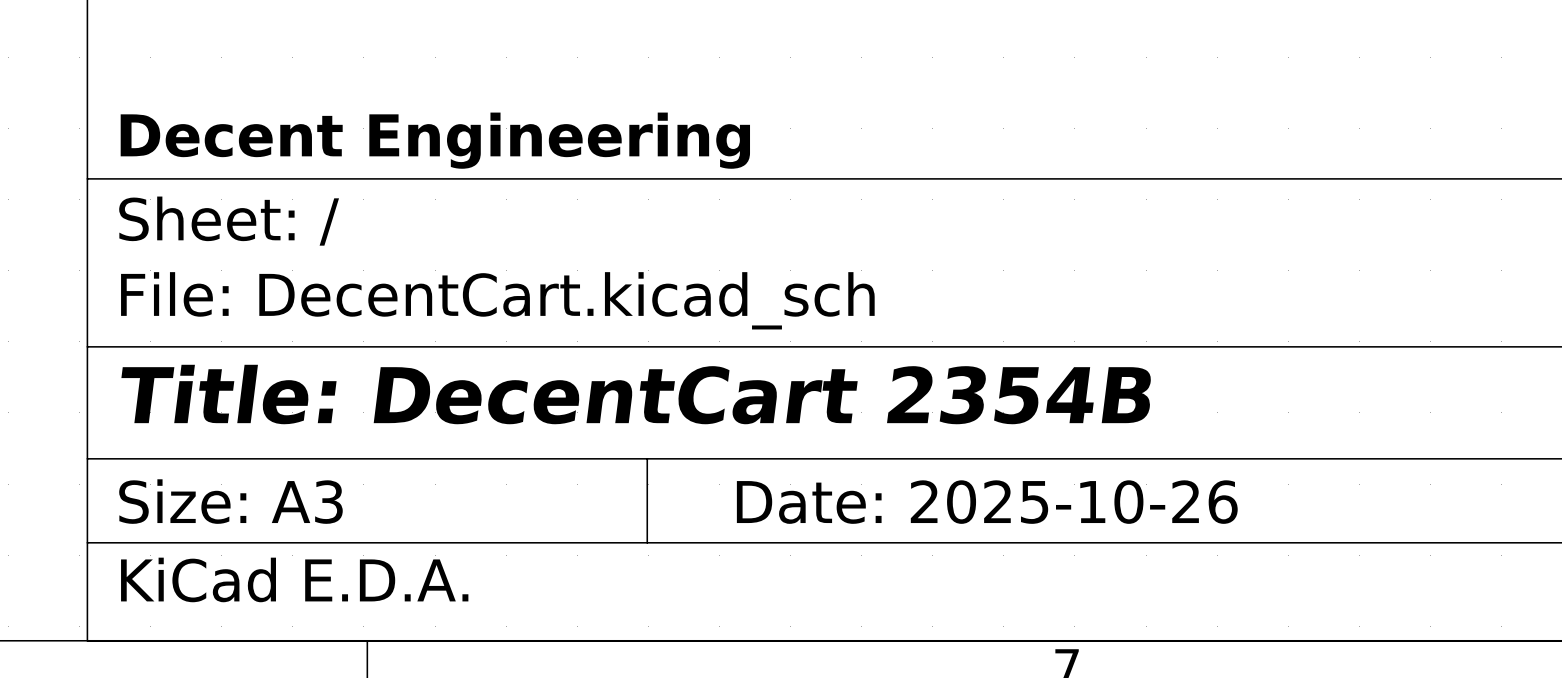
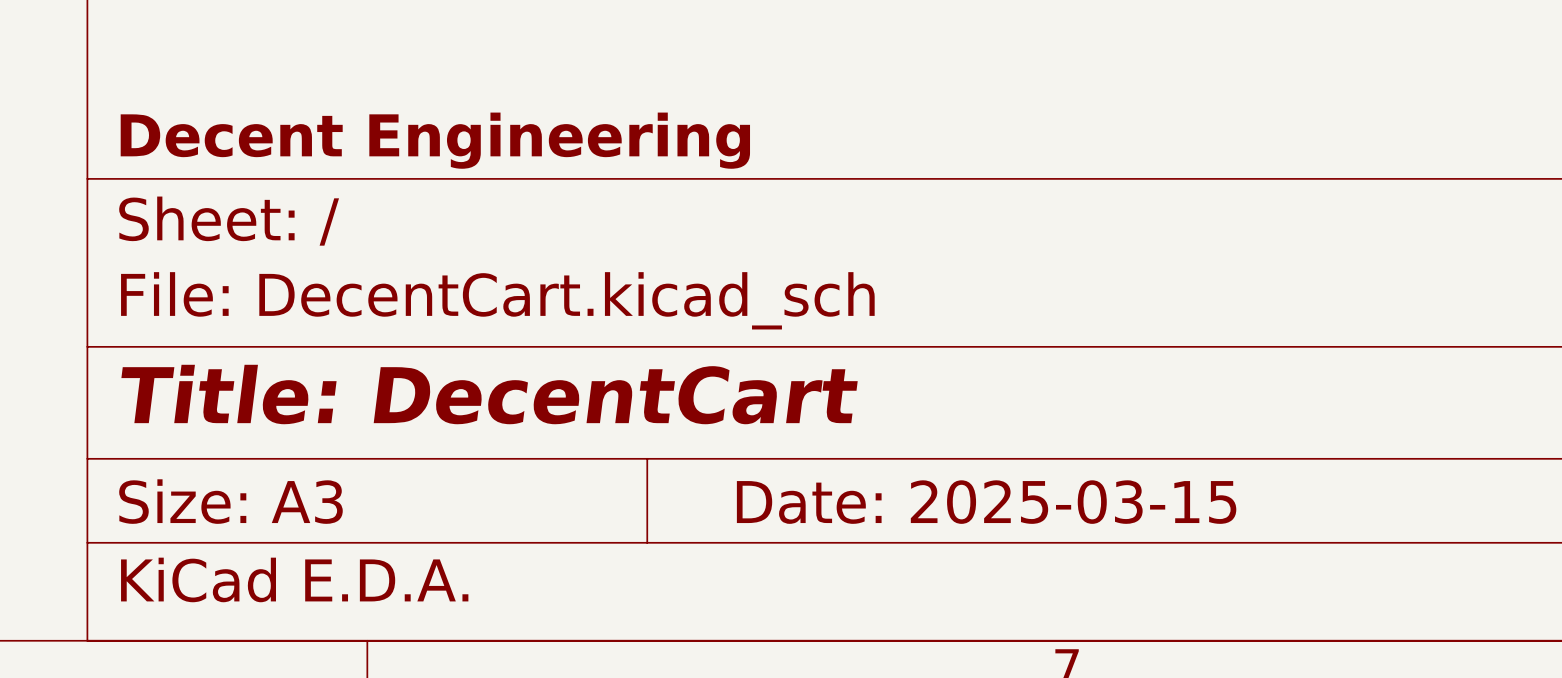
title block: Title: DecentCart 2354B (636, 394) -> Title: DecentCart (489, 394)
title block: Date: 2025-10-26 (987, 502) -> Date: 2025-03-15 (986, 502)

